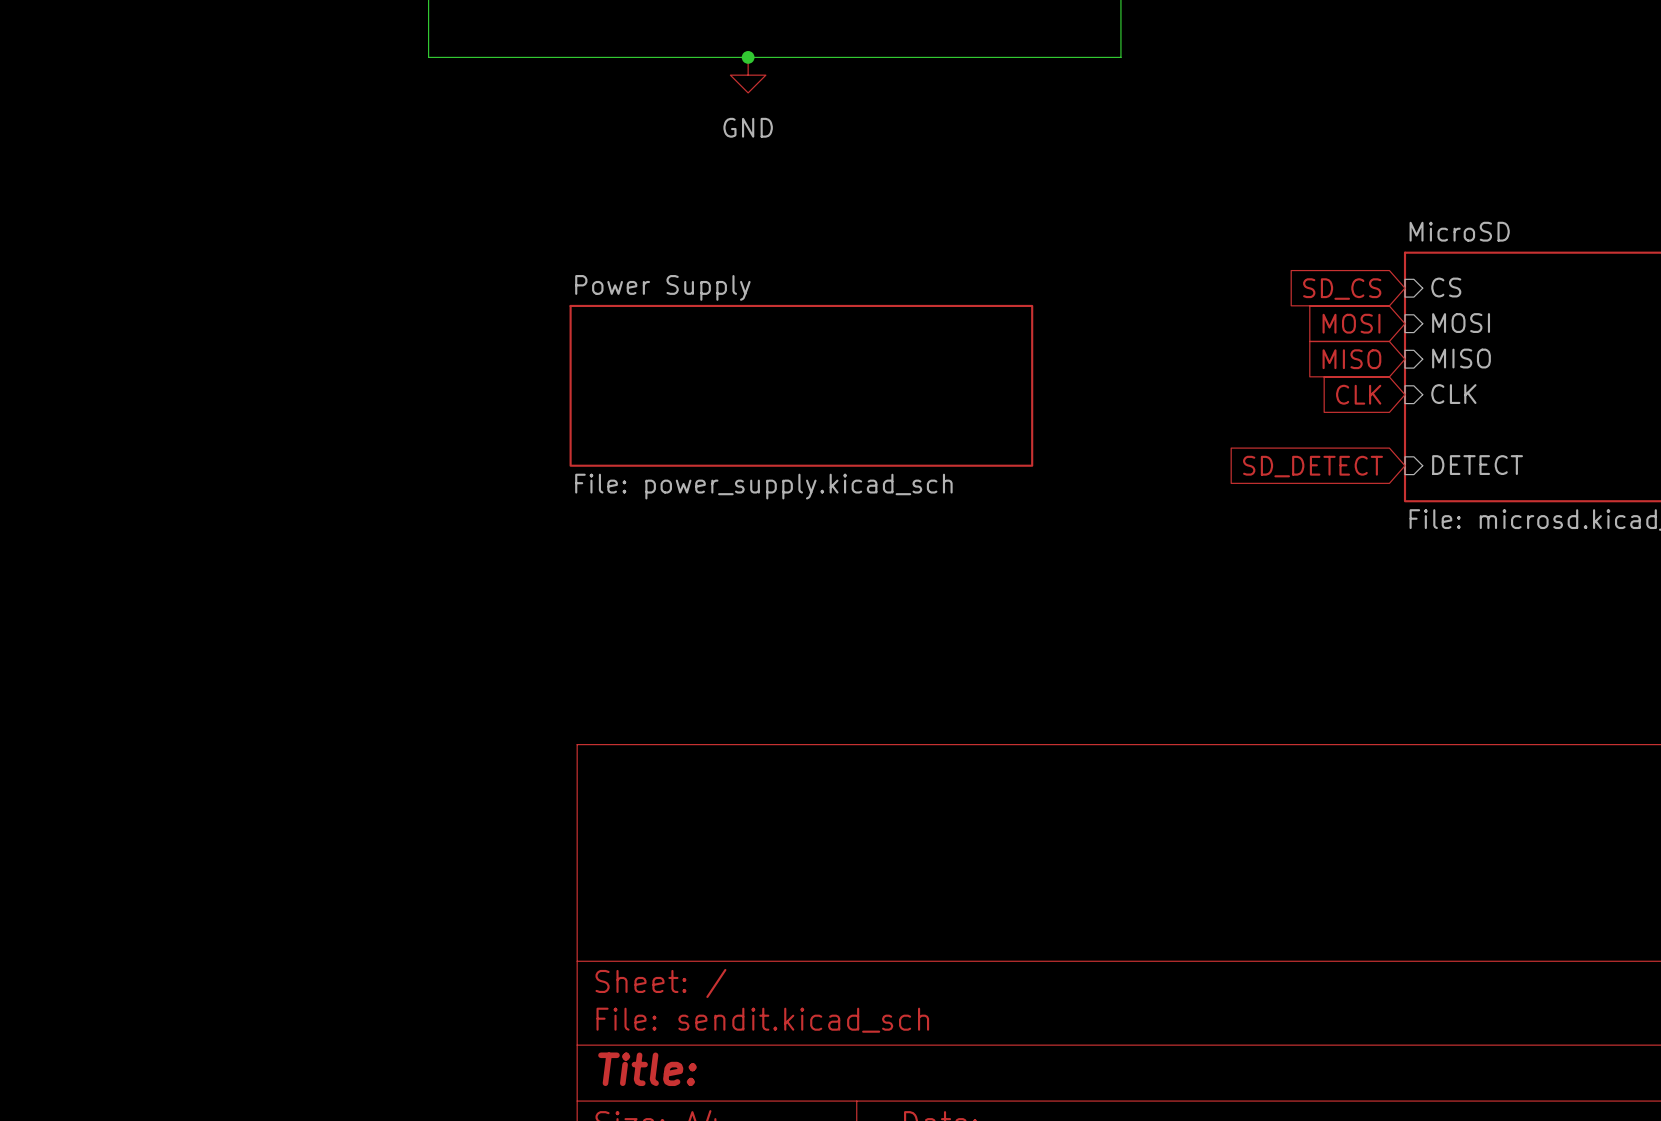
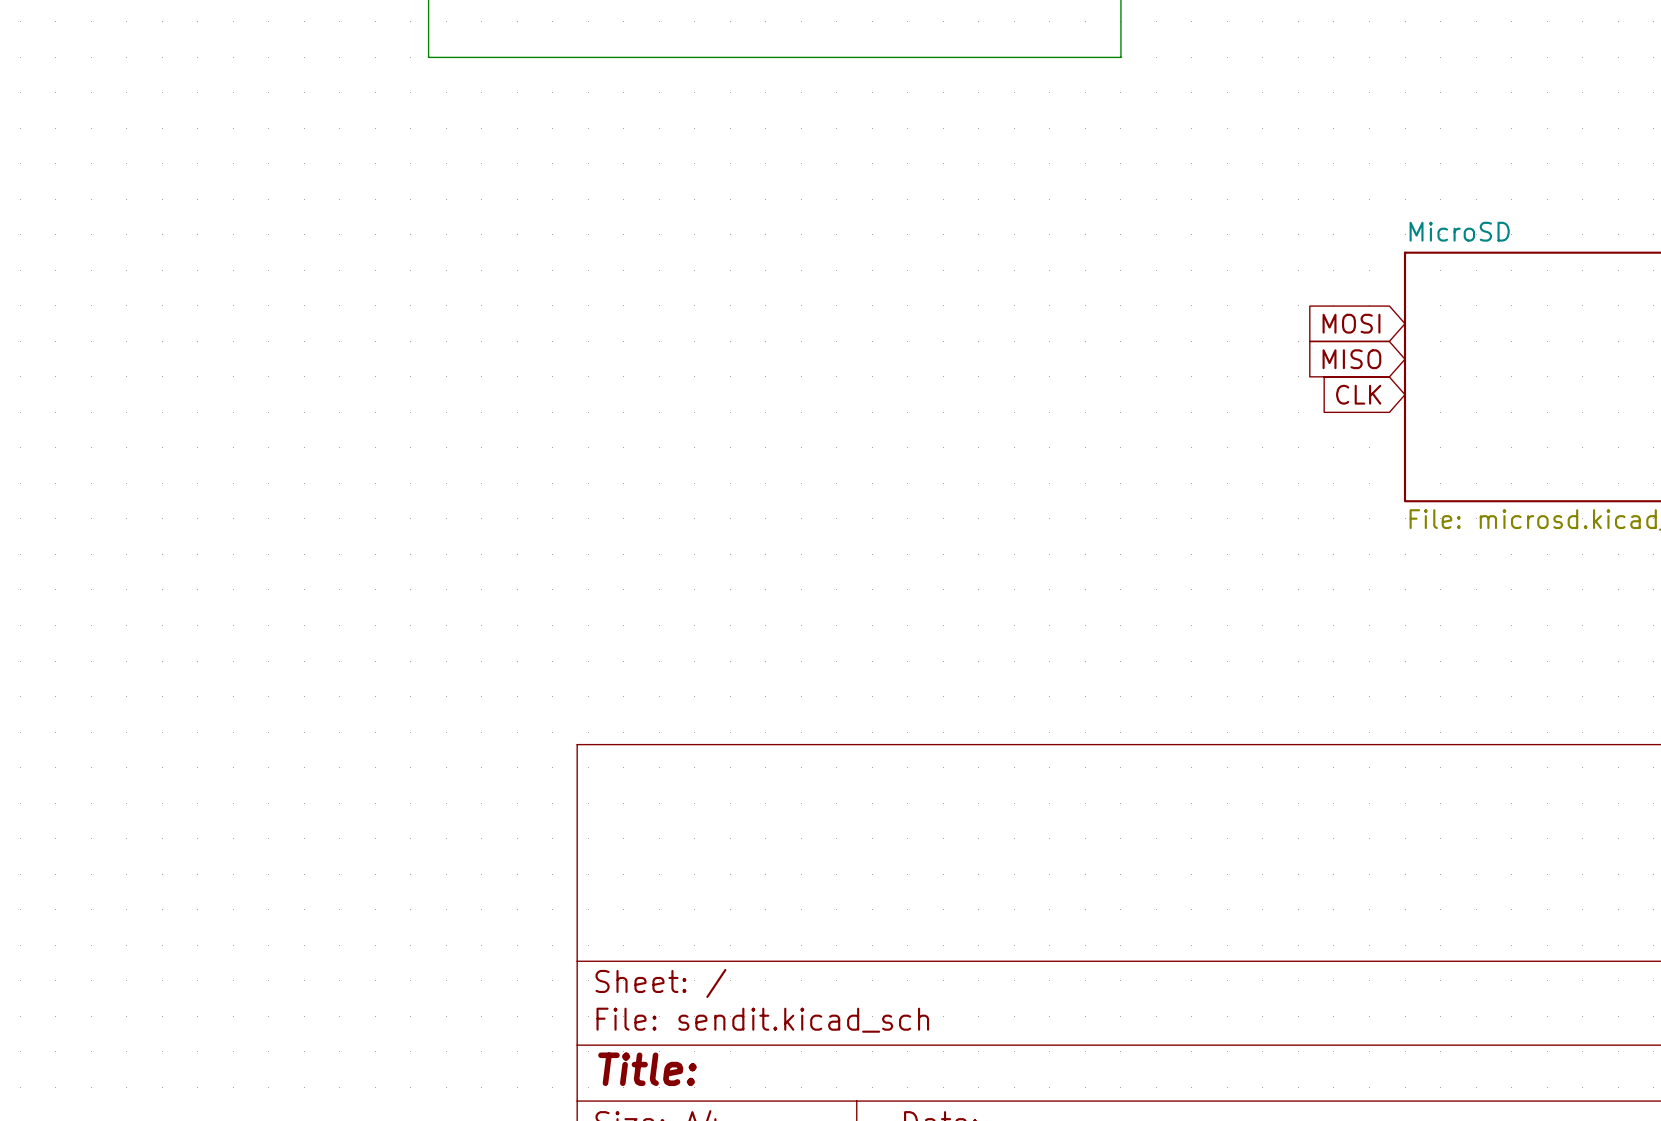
junction: (748, 57) -> none
power symbol: GND (748, 75) -> none
sheet pin: CS (1446, 287) -> none
global label: SD_CS (1342, 289) -> none
sheet pin: MOSI (1461, 323) -> none
sheet pin: MISO (1461, 358) -> none
sheet Power Supply: File: power_supply.kicad_sch (801, 385) -> none
sheet pin: CLK (1453, 394) -> none
sheet pin: DETECT (1477, 465) -> none
global label: SD_DETECT (1313, 466) -> none

